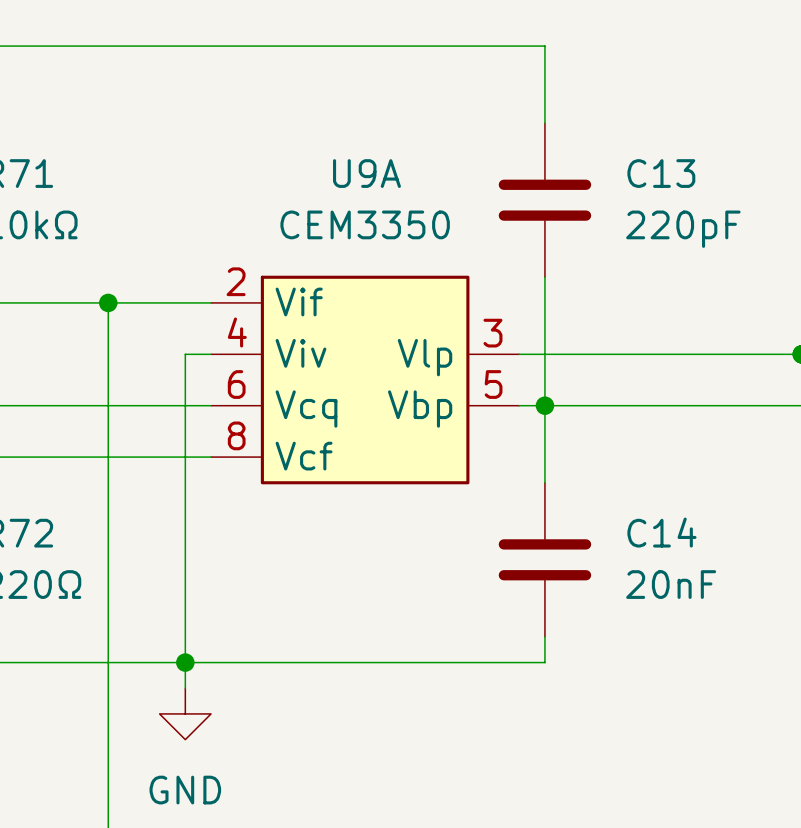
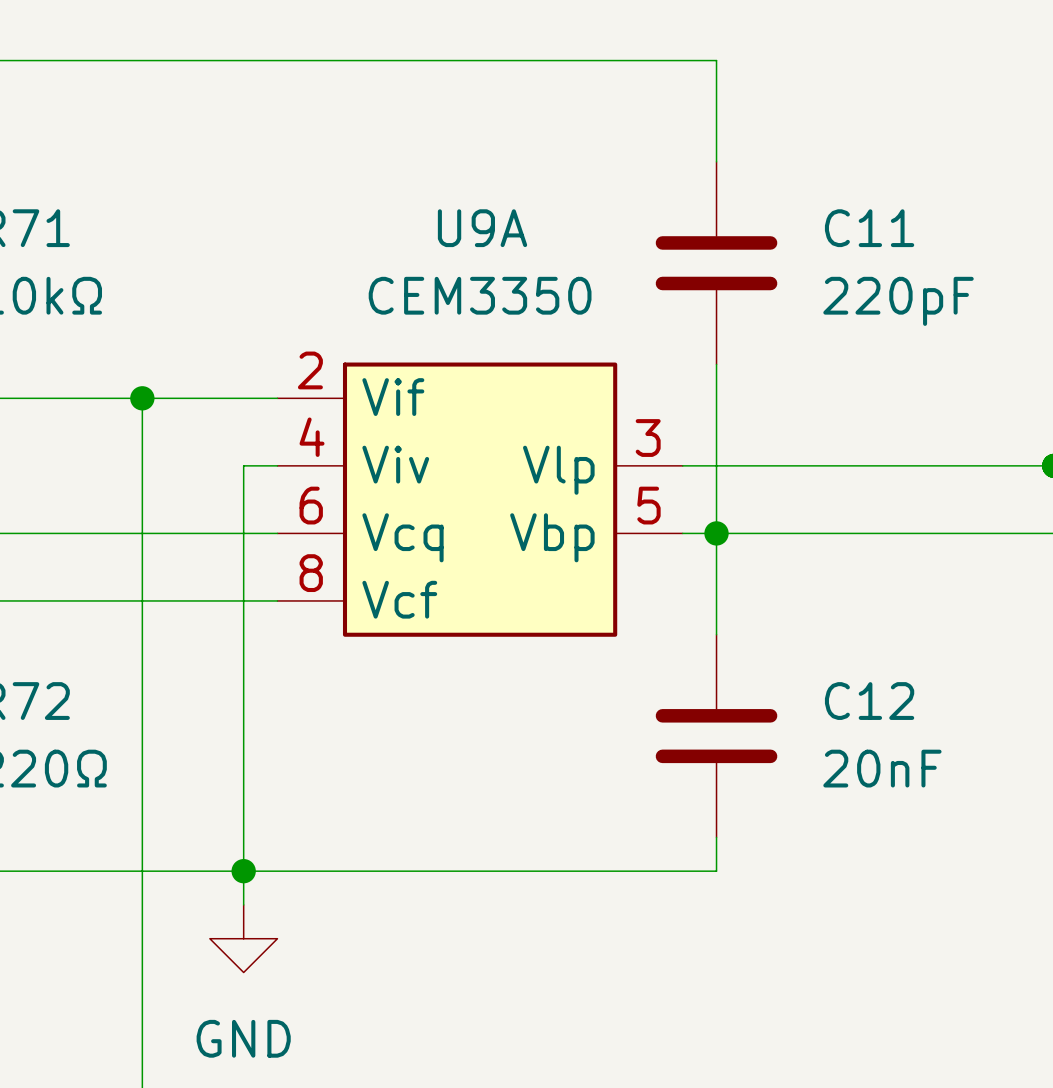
C13 name: C13 (661, 173) -> C11 (869, 228)
C14 name: C14 (661, 532) -> C12 (869, 701)

